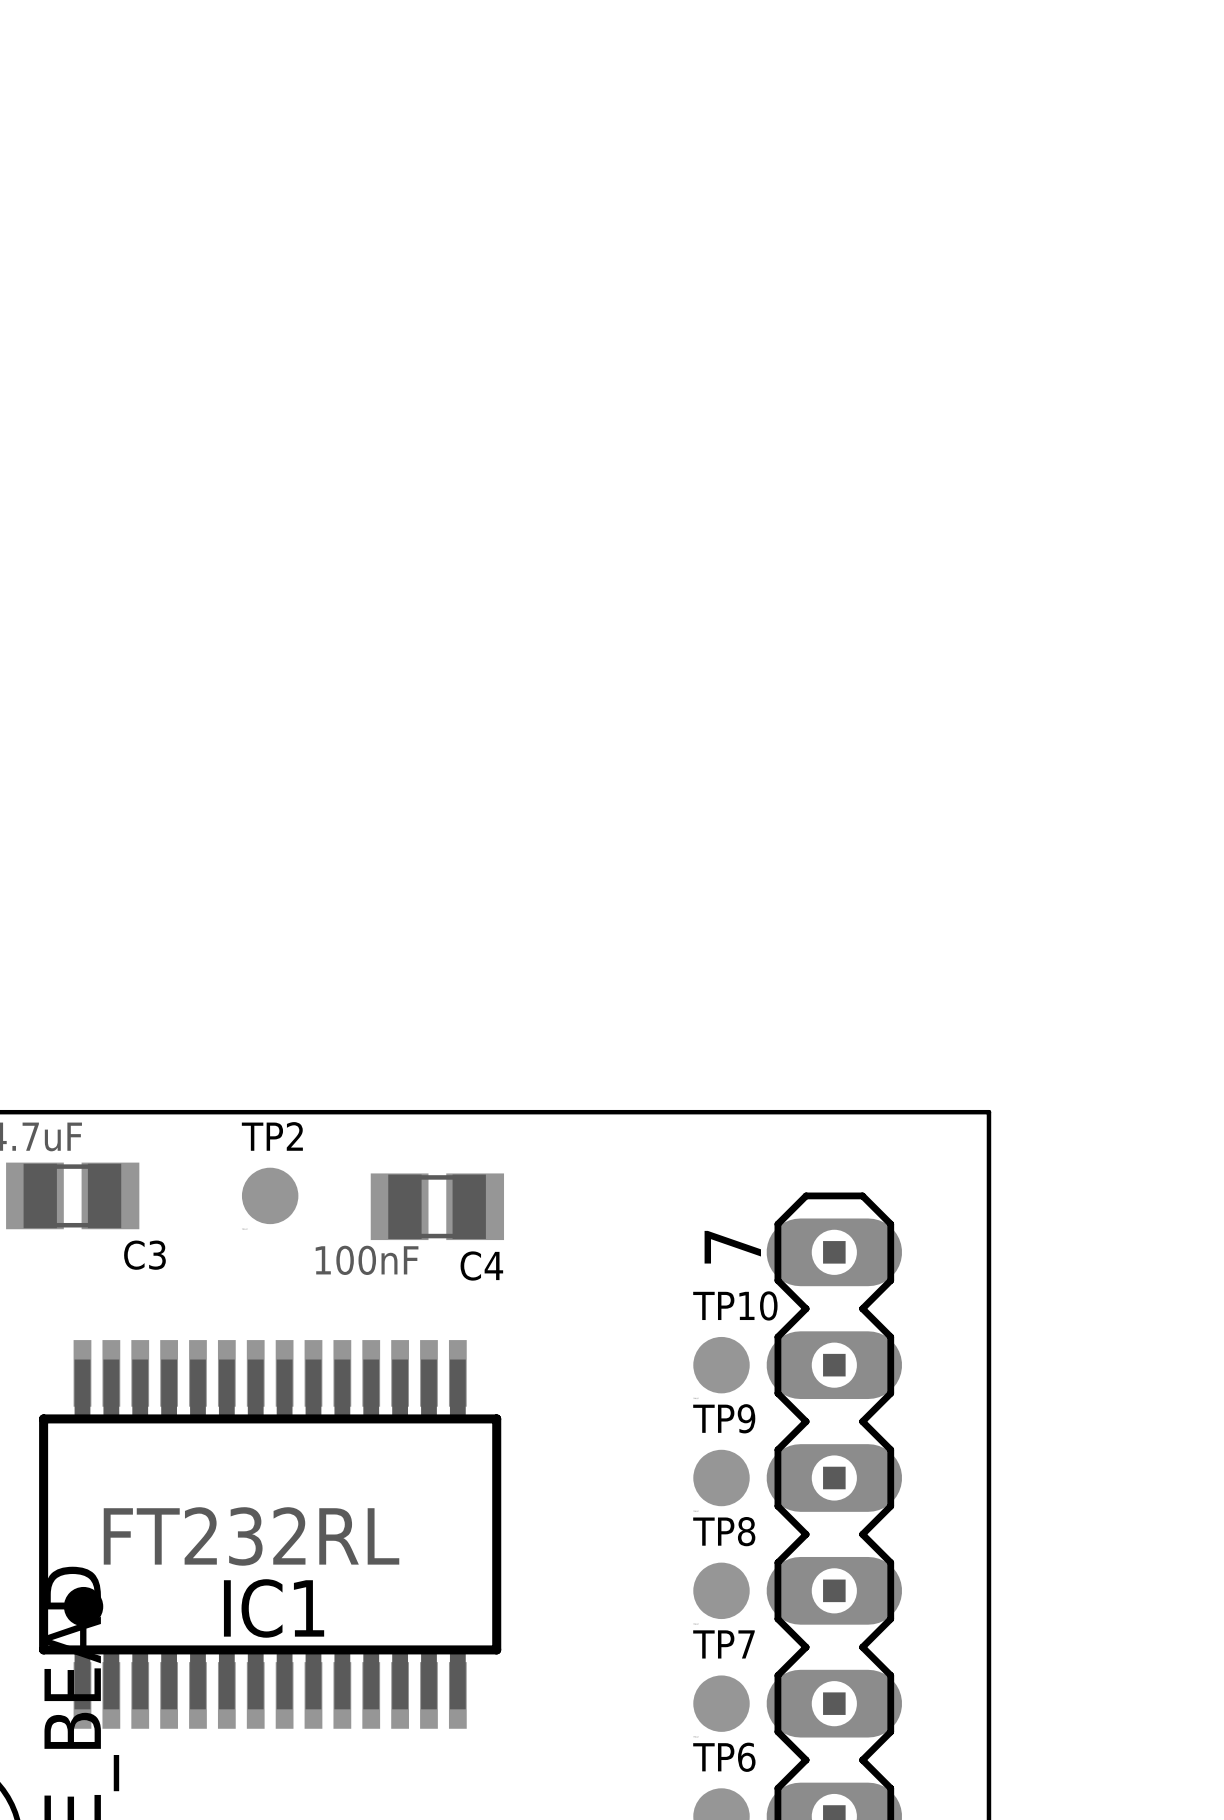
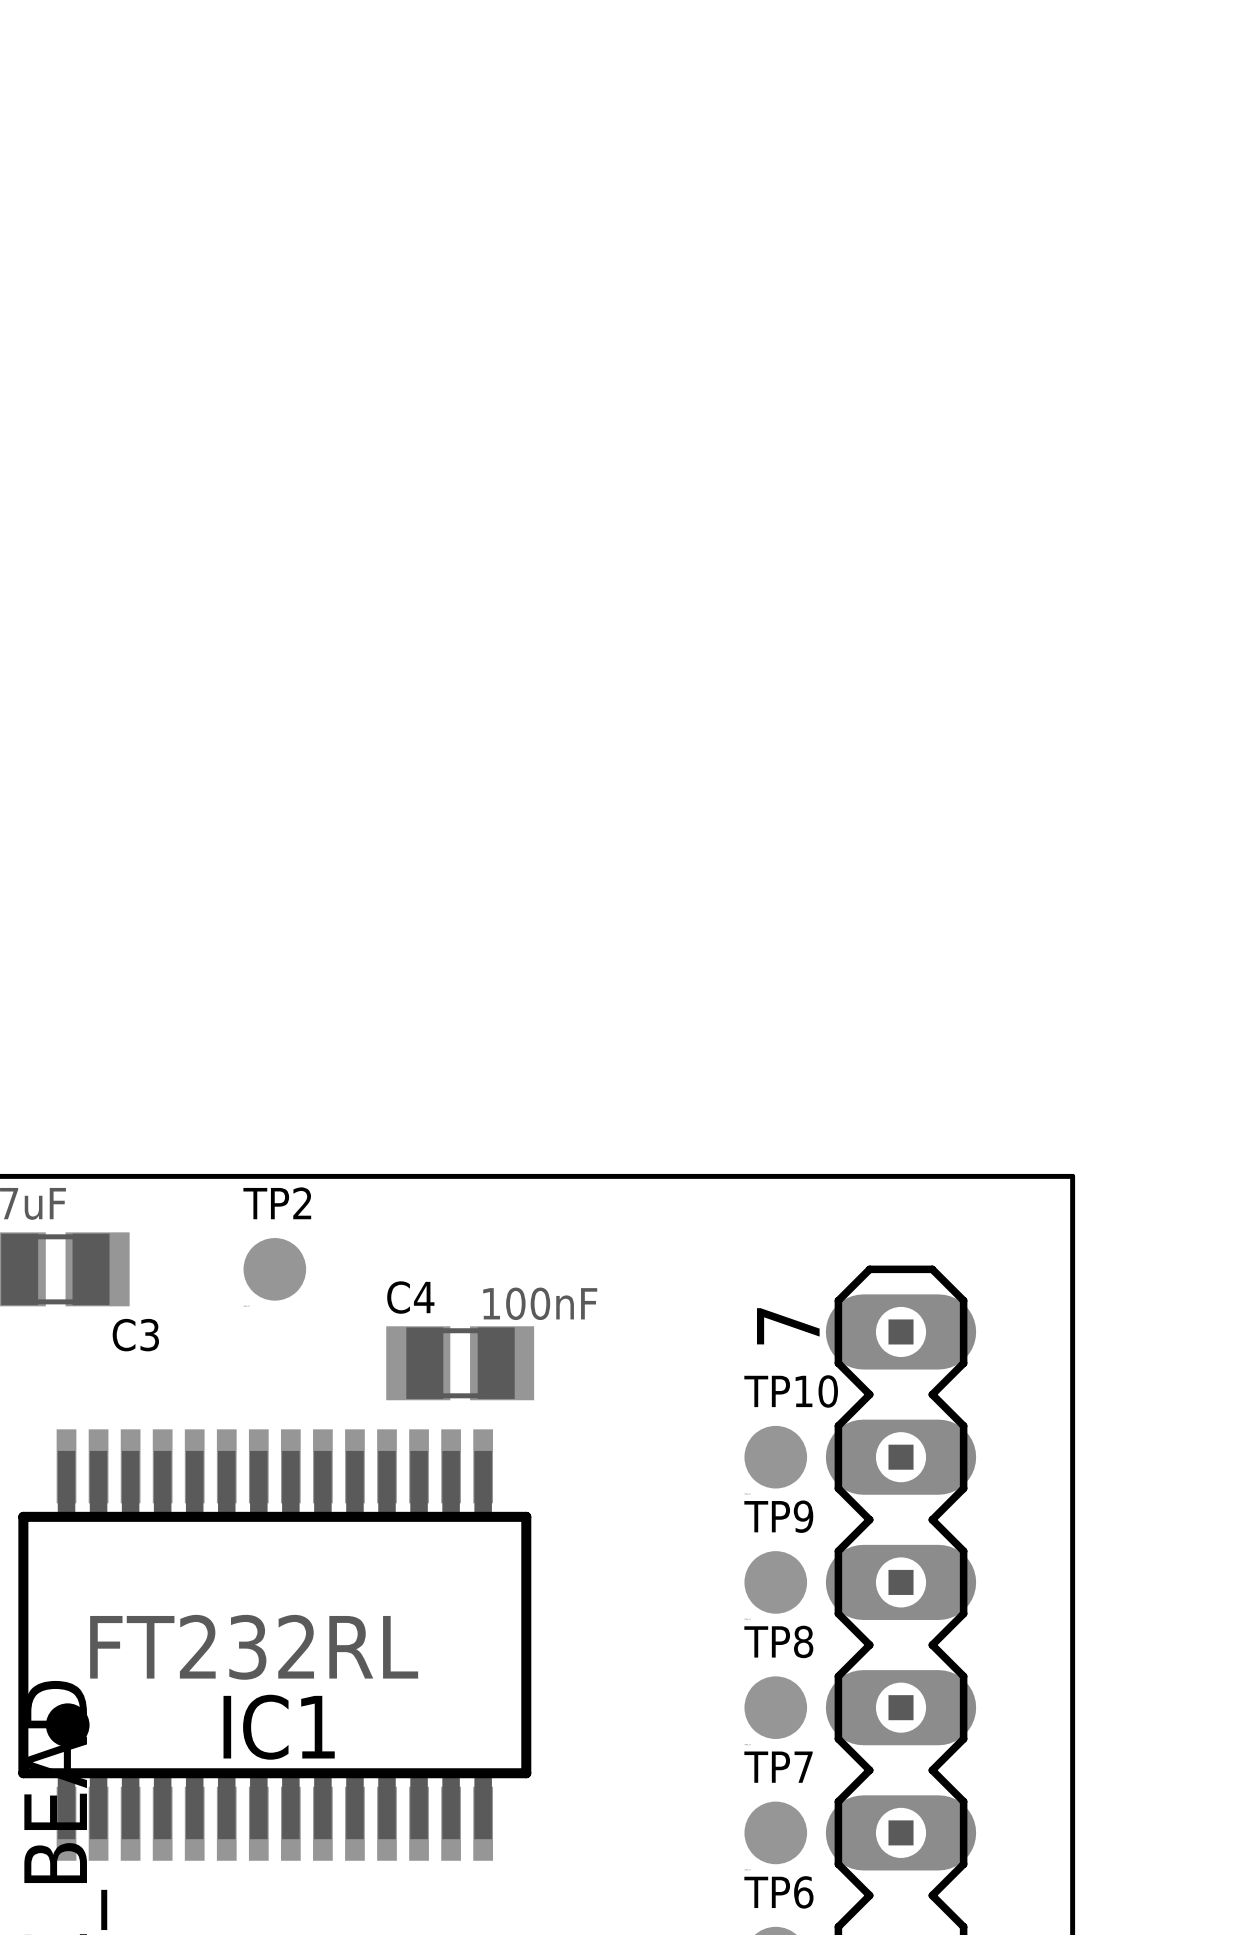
C4 position: (437, 1206) -> (460, 1363)
C4 value position: 100nF (367, 1260) -> 100nF (540, 1303)
C4 name position: C4 (481, 1266) -> C4 (410, 1297)

